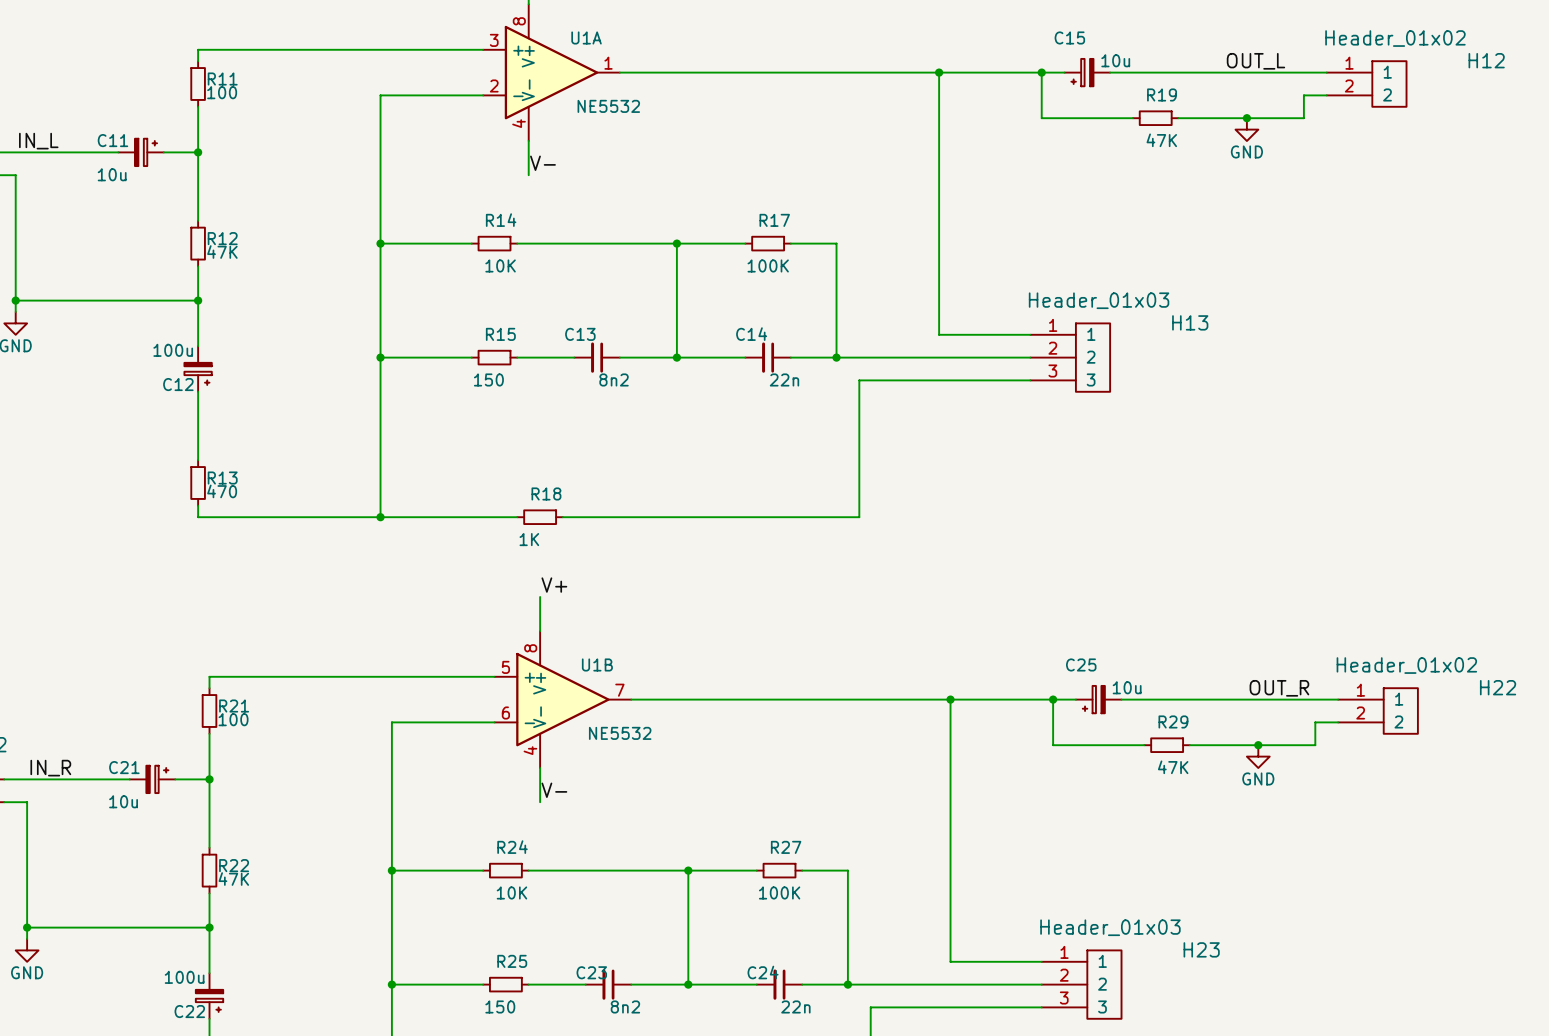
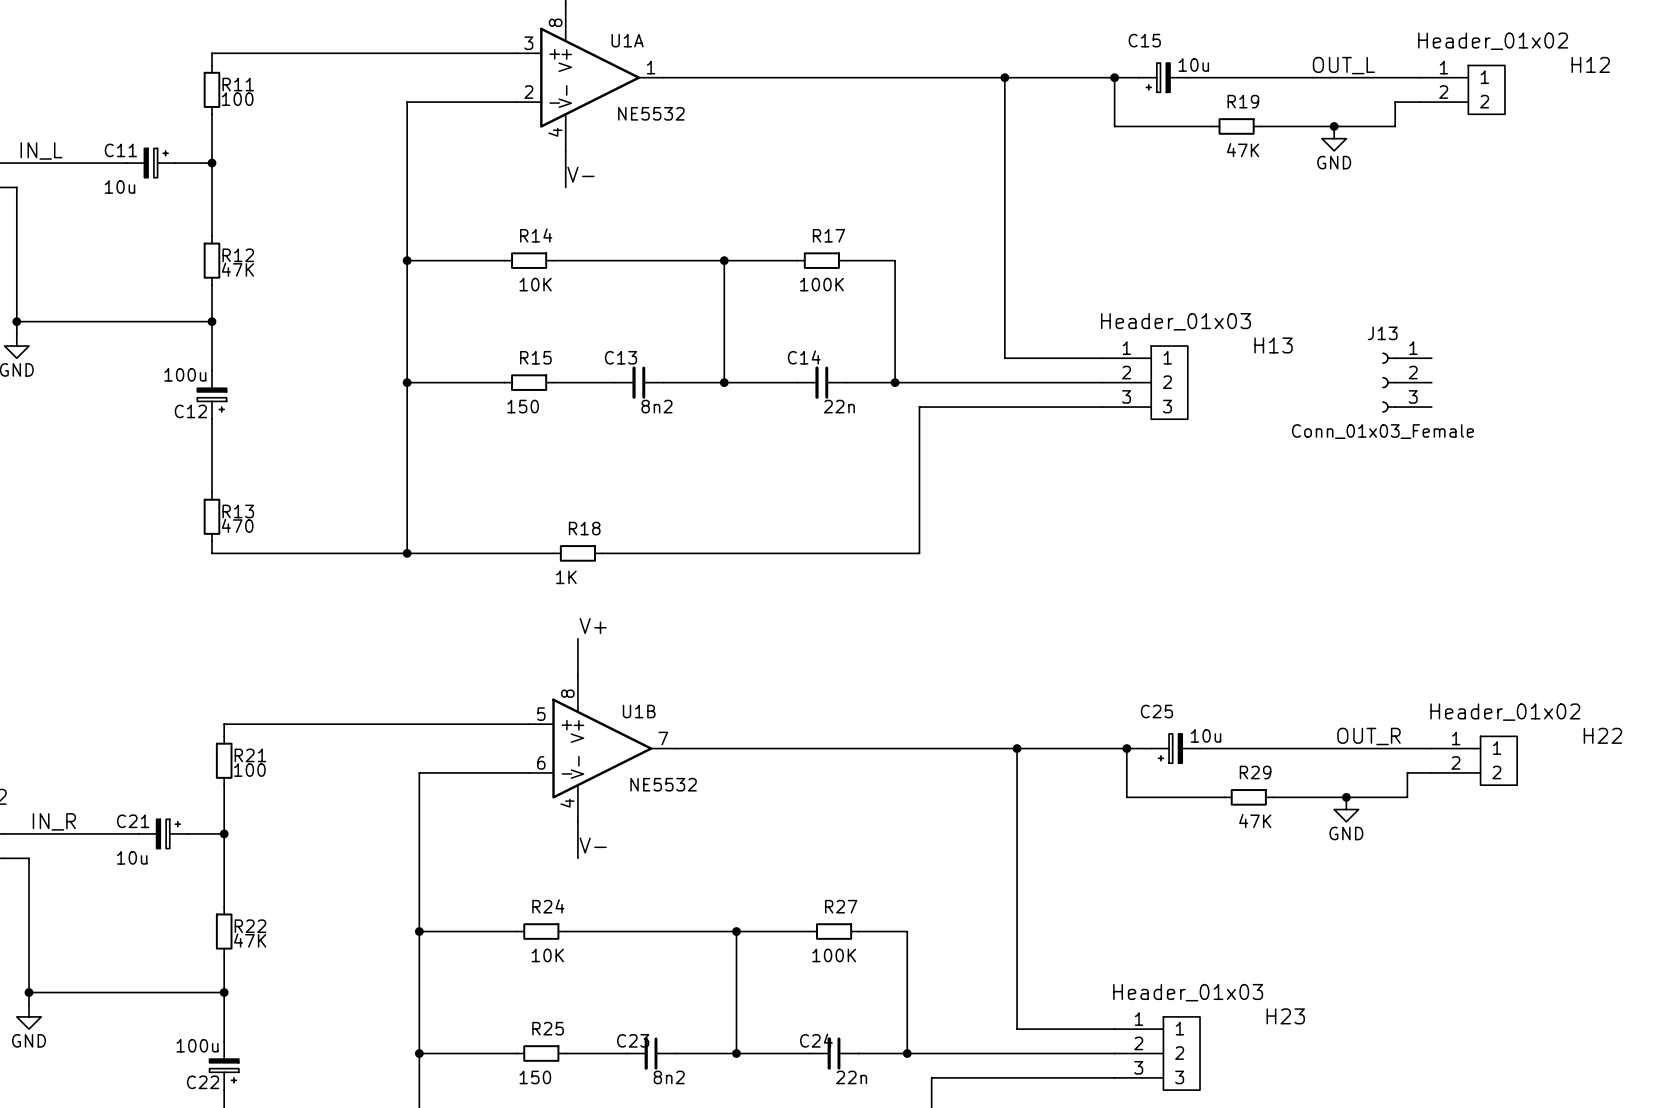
J13: none -> Conn_01x03_Female (1407, 382)

